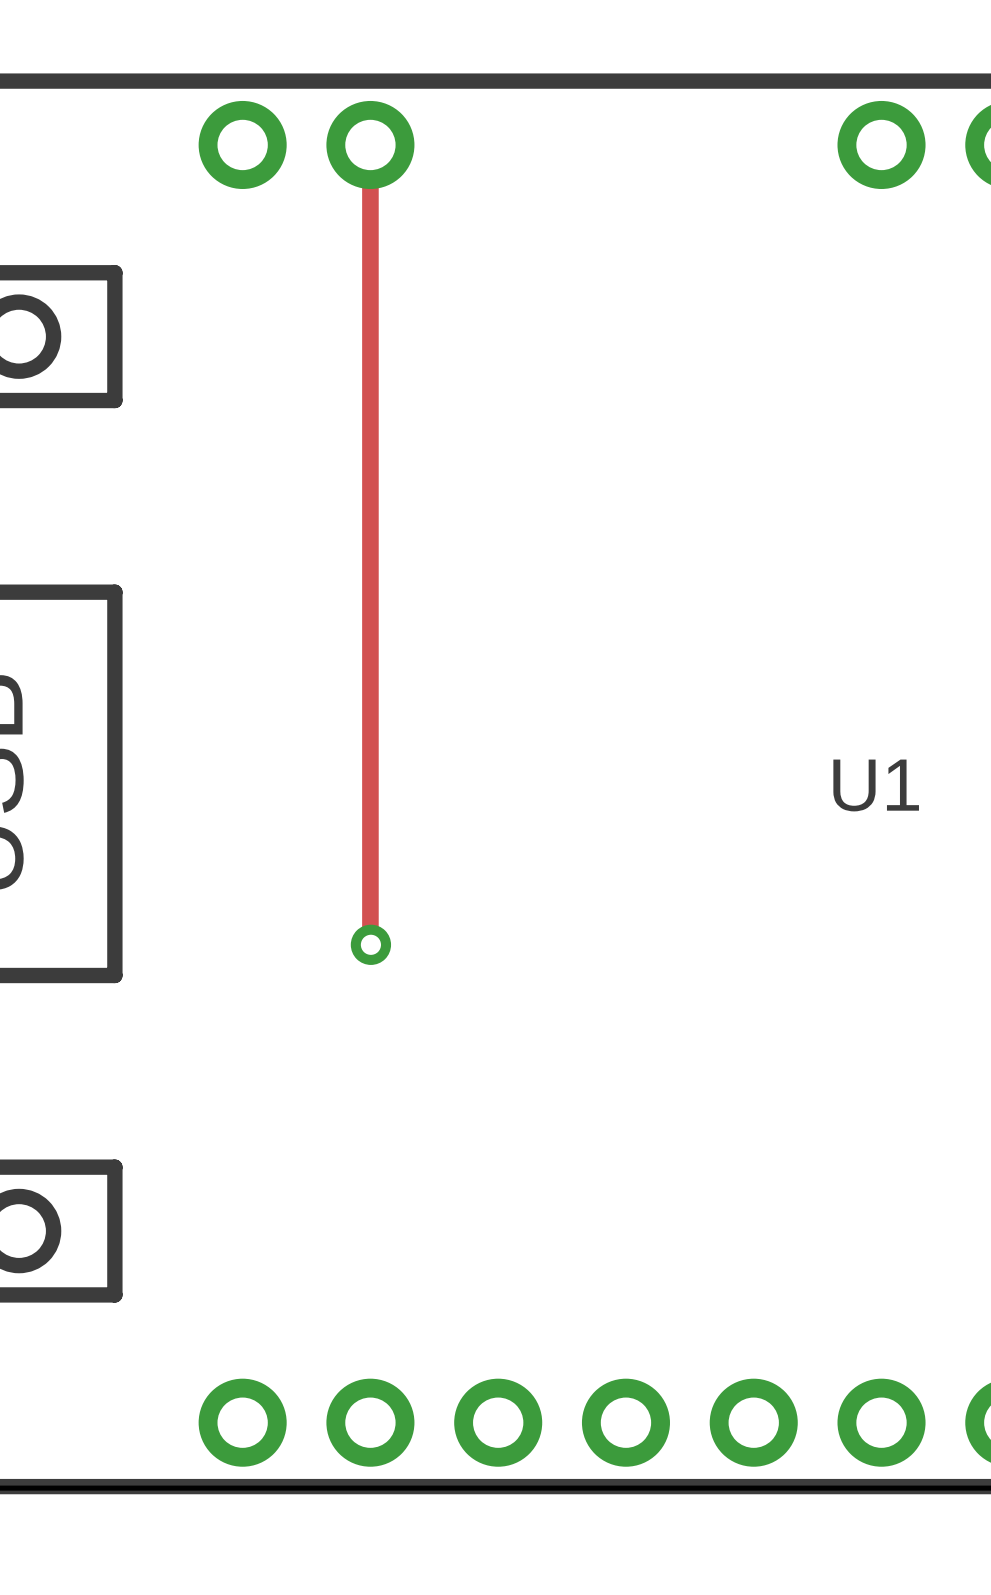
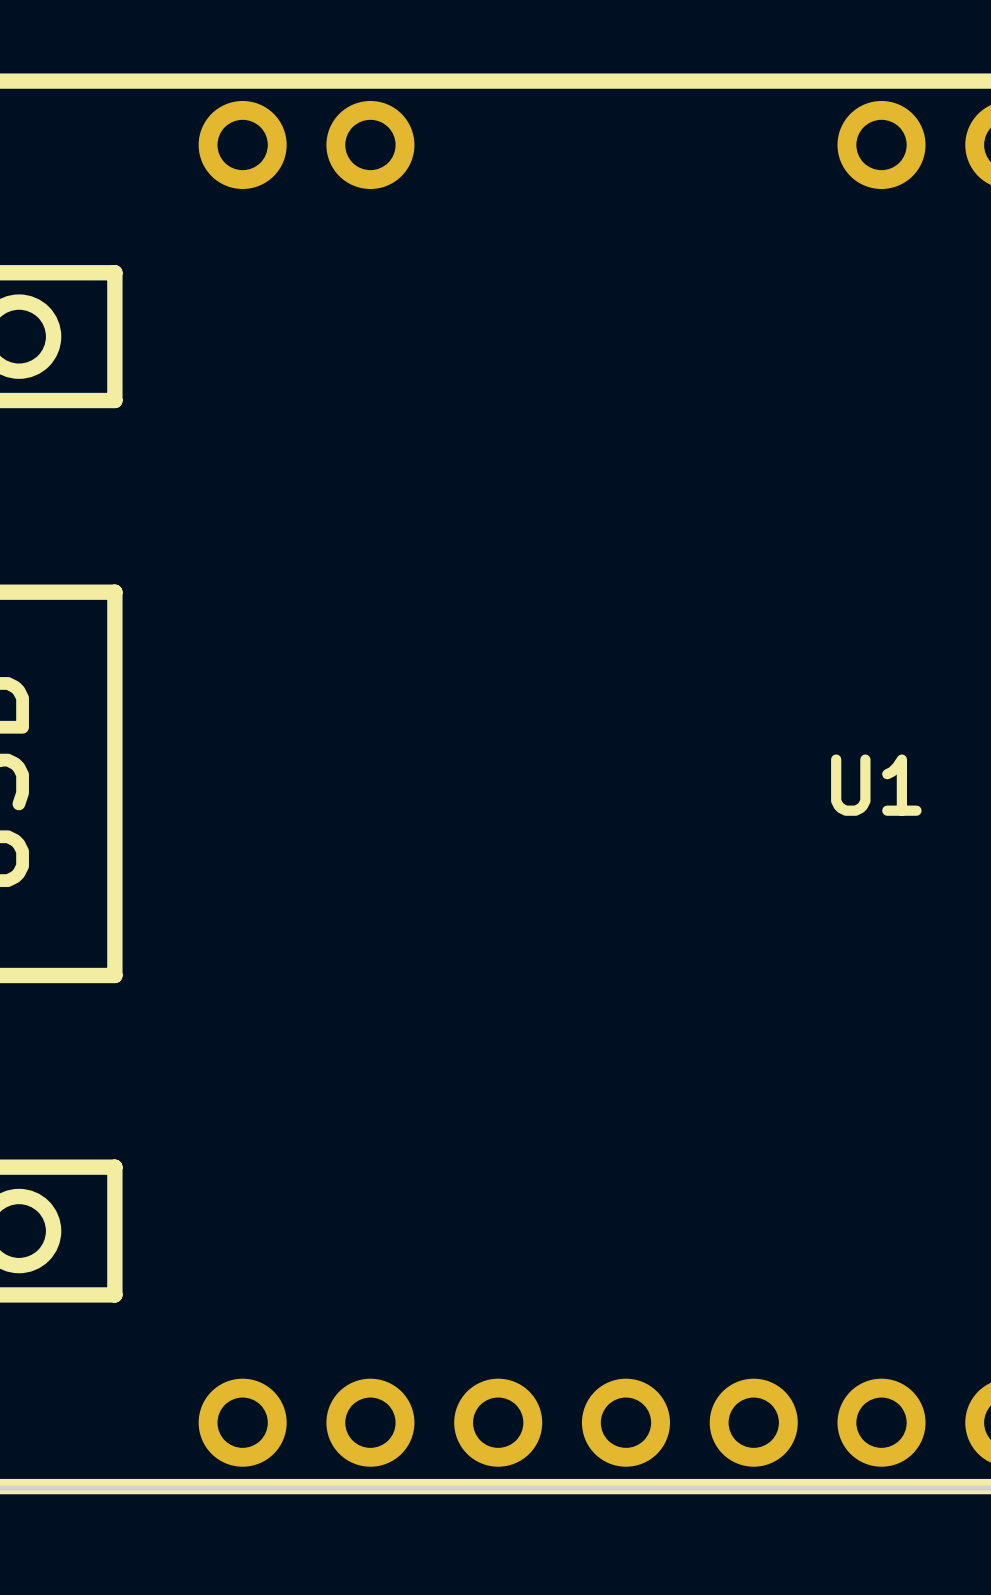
track: (370, 144) (370, 944) -> none
via: (370, 944) -> none

